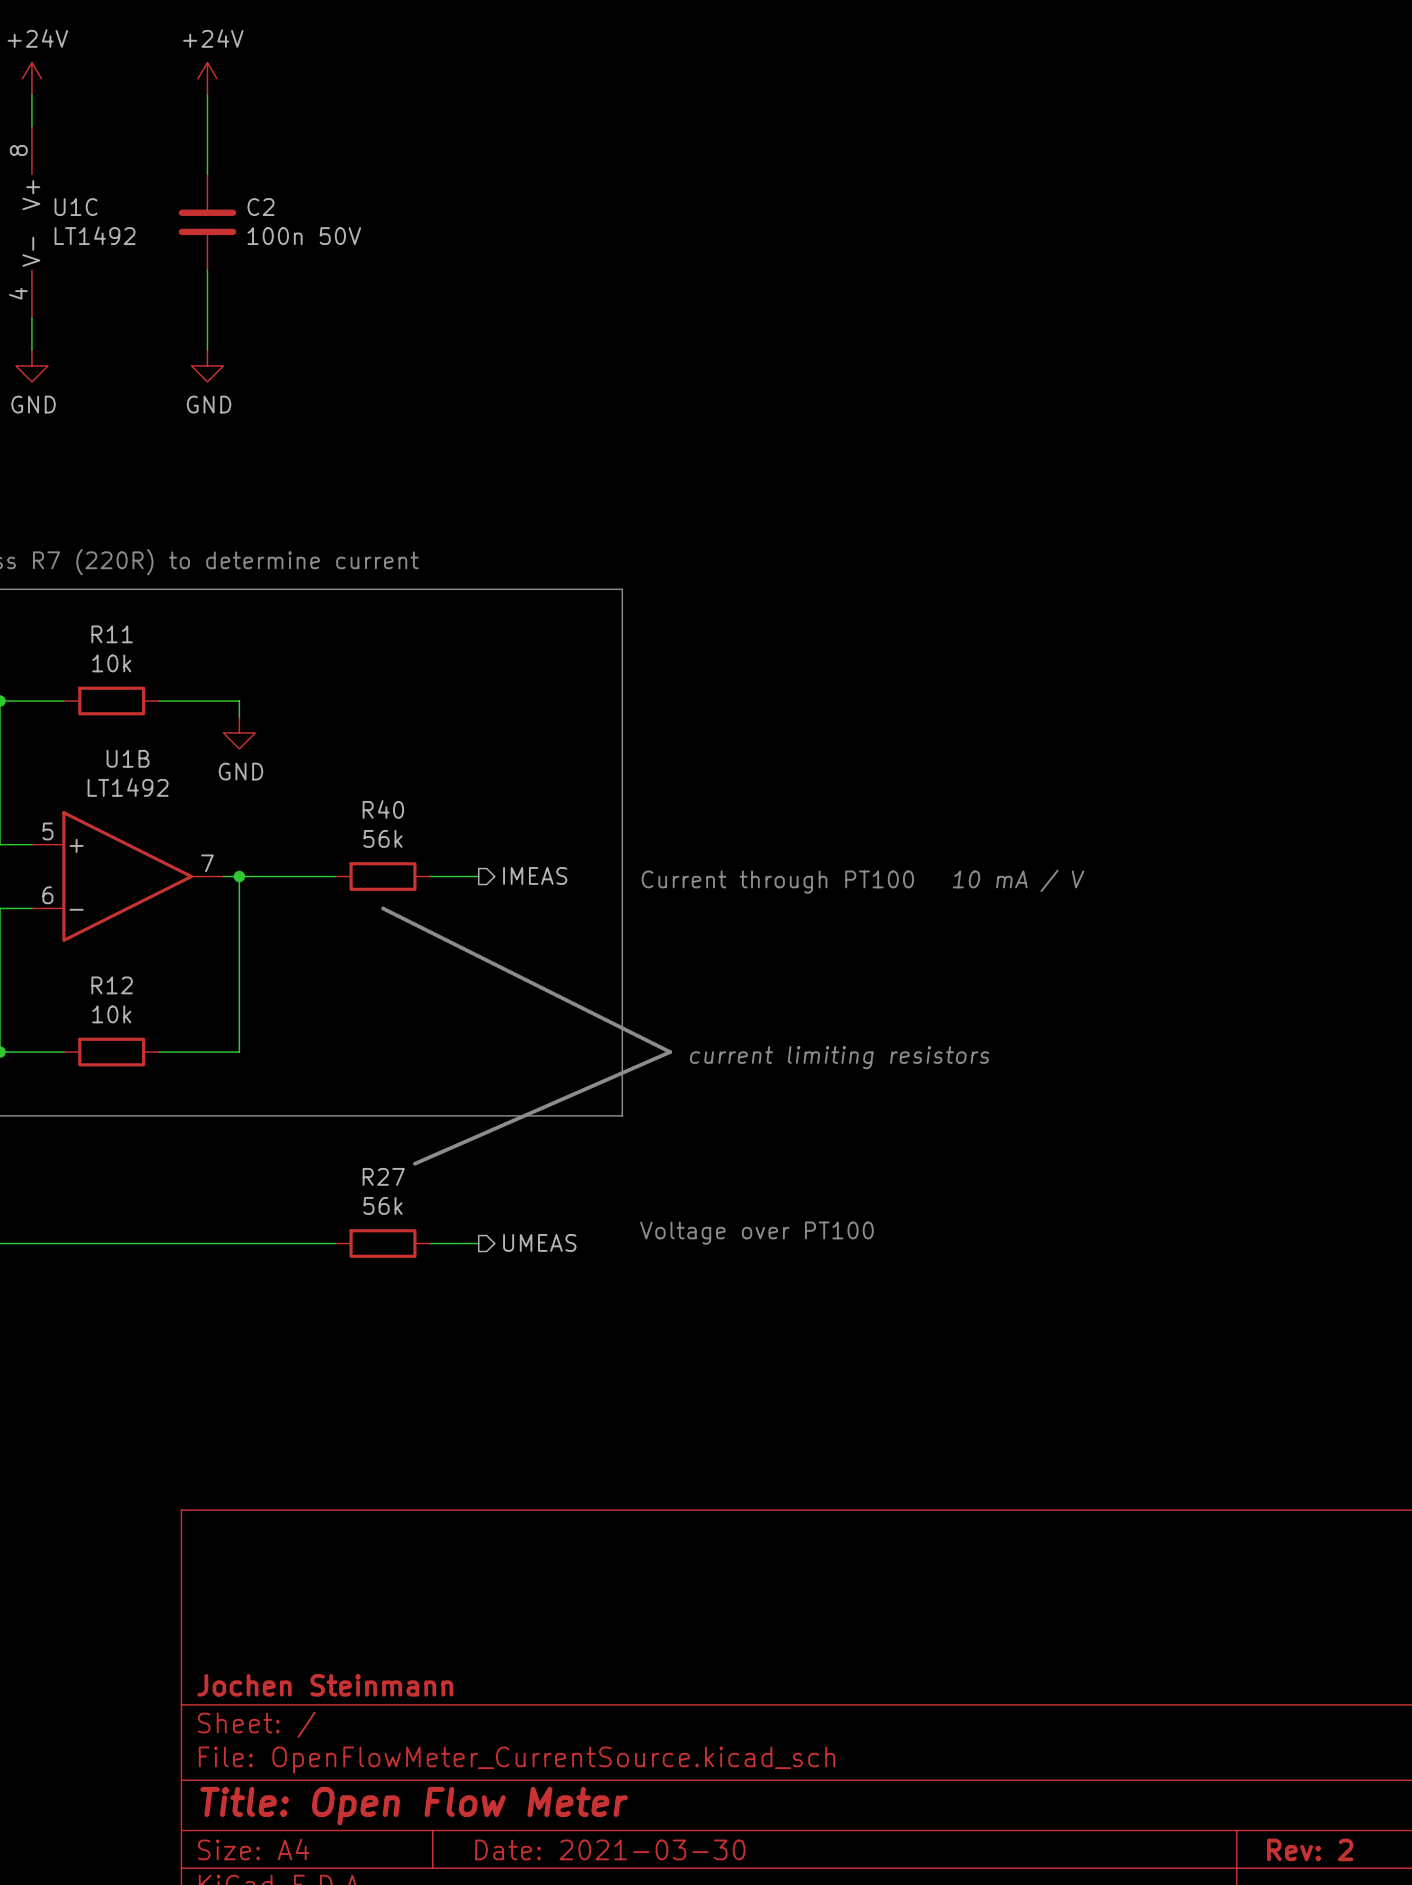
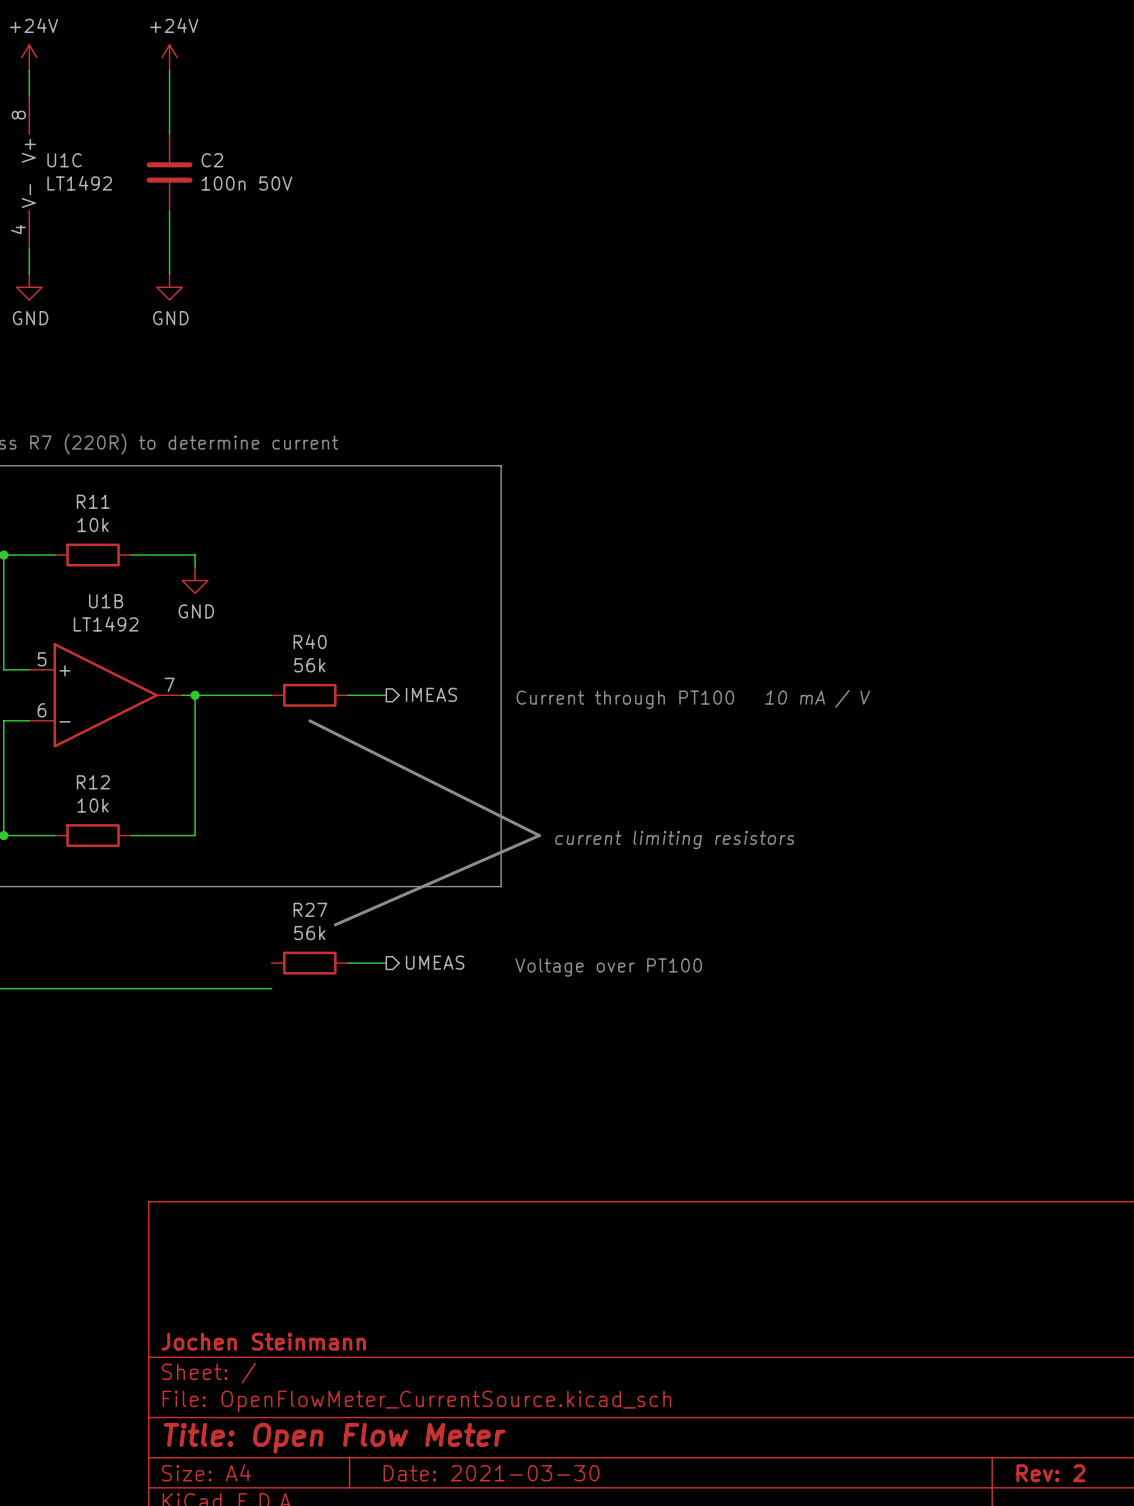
text position: Voltage over PT100 (756, 1233) -> Voltage over PT100 (608, 967)
hierarchical label position: UMEAS (539, 1242) -> UMEAS (435, 962)
R27 position: (382, 1243) -> (309, 963)
wire: (430, 1243) (478, 1243) -> (348, 963) (386, 963)

